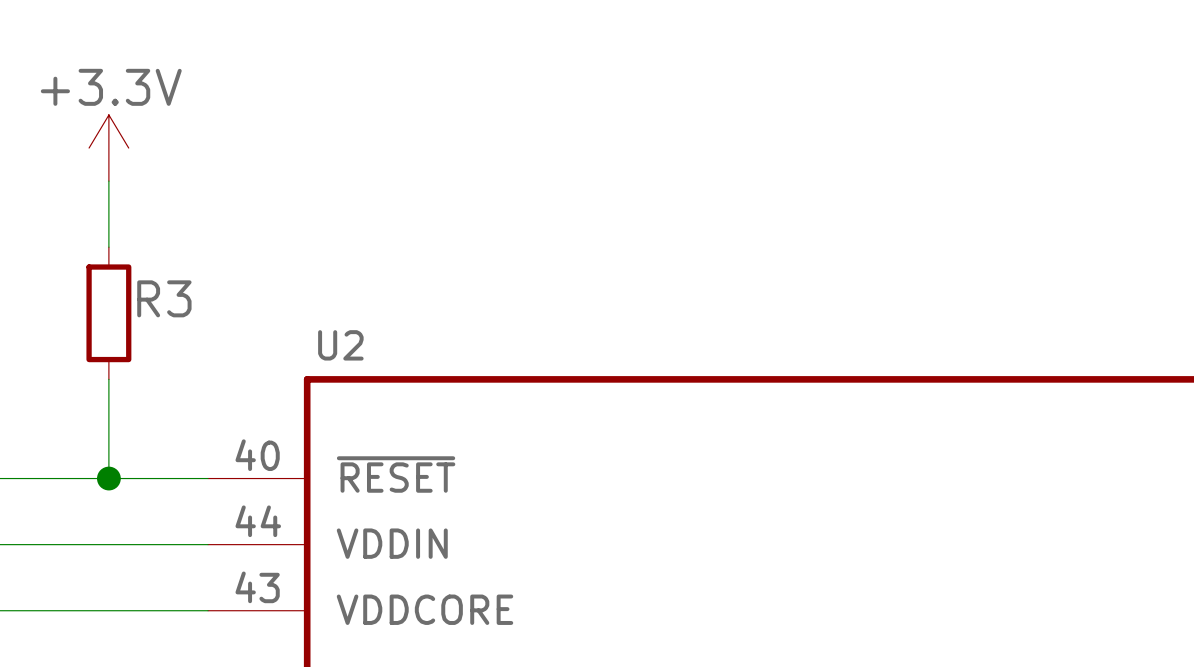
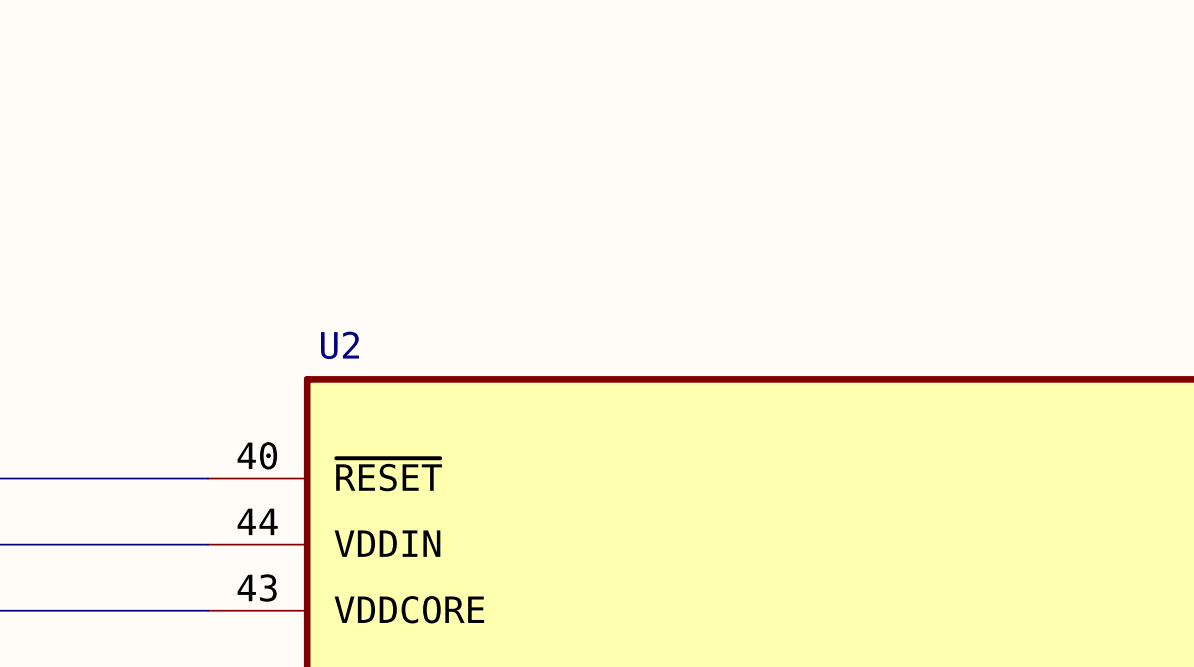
power symbol: +3.3V (108, 148) -> none
wire: (108, 181) (108, 247) -> none
R3: (108, 313) -> none
wire: (108, 379) (108, 478) -> none
junction: (108, 478) -> none

